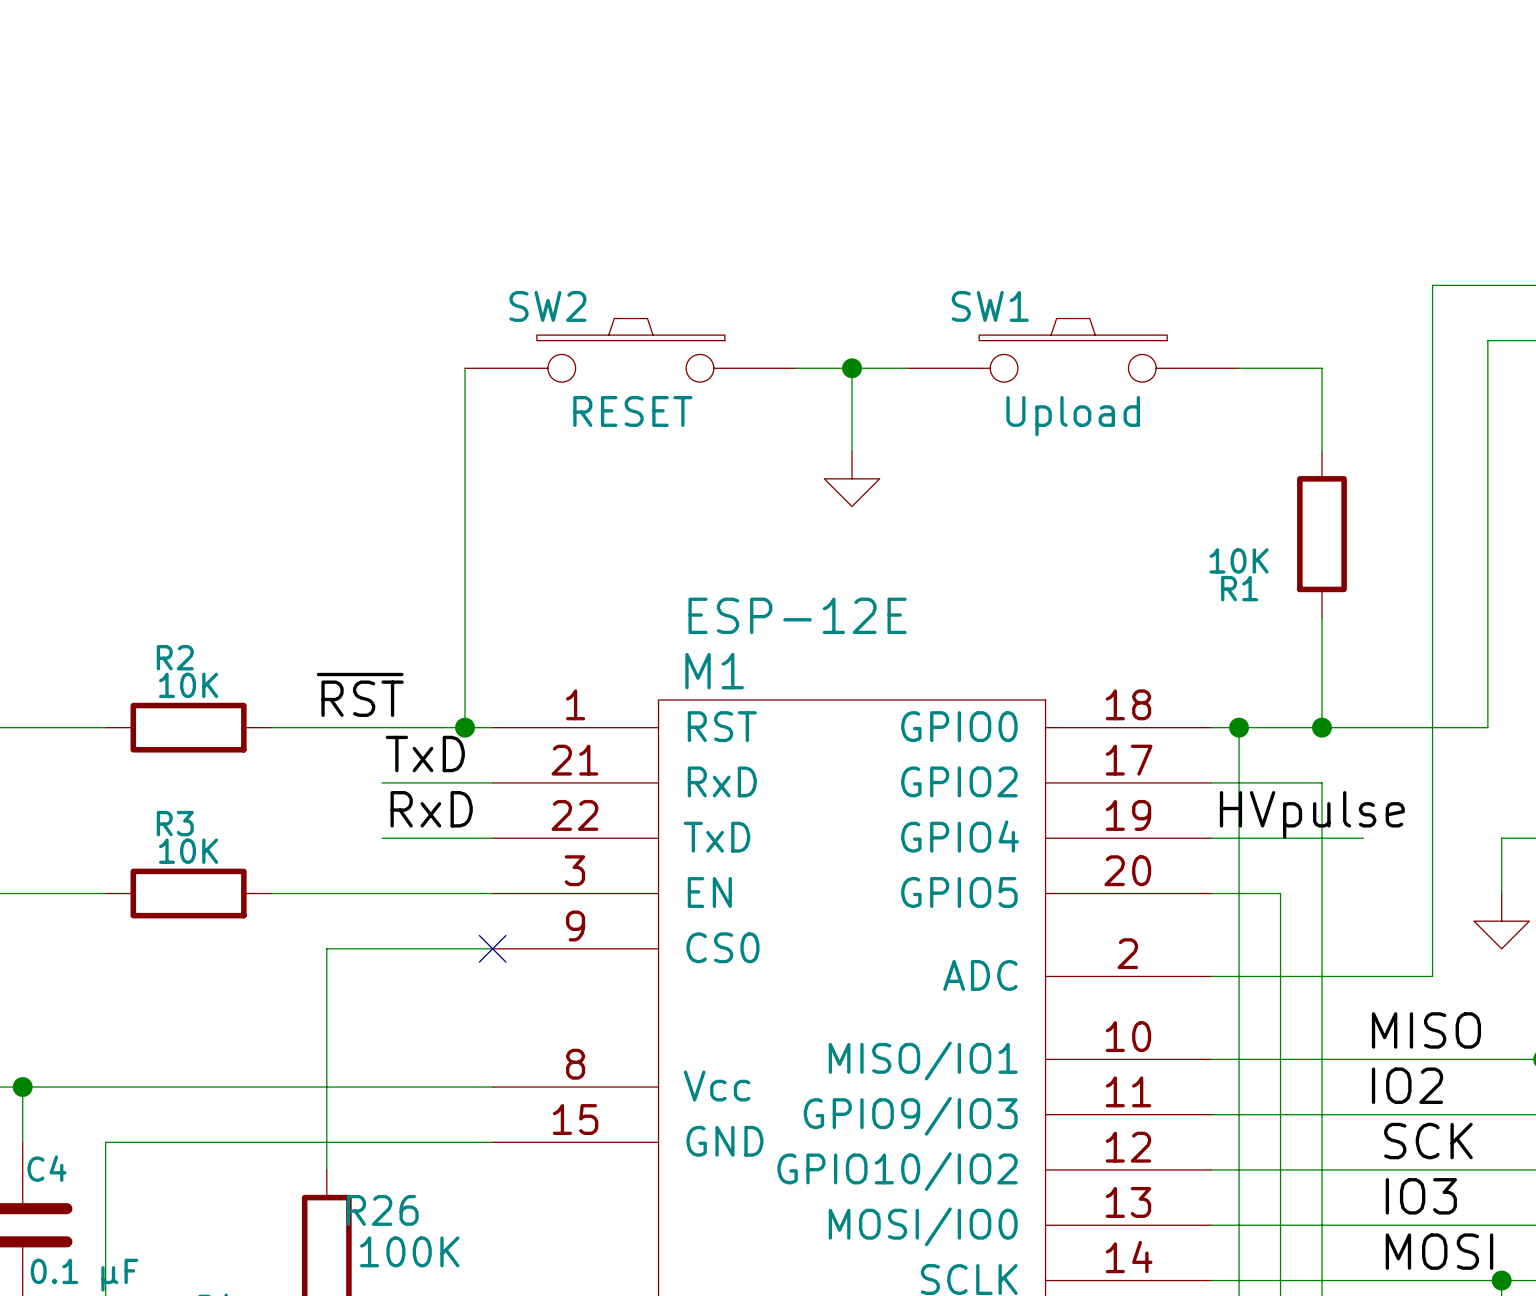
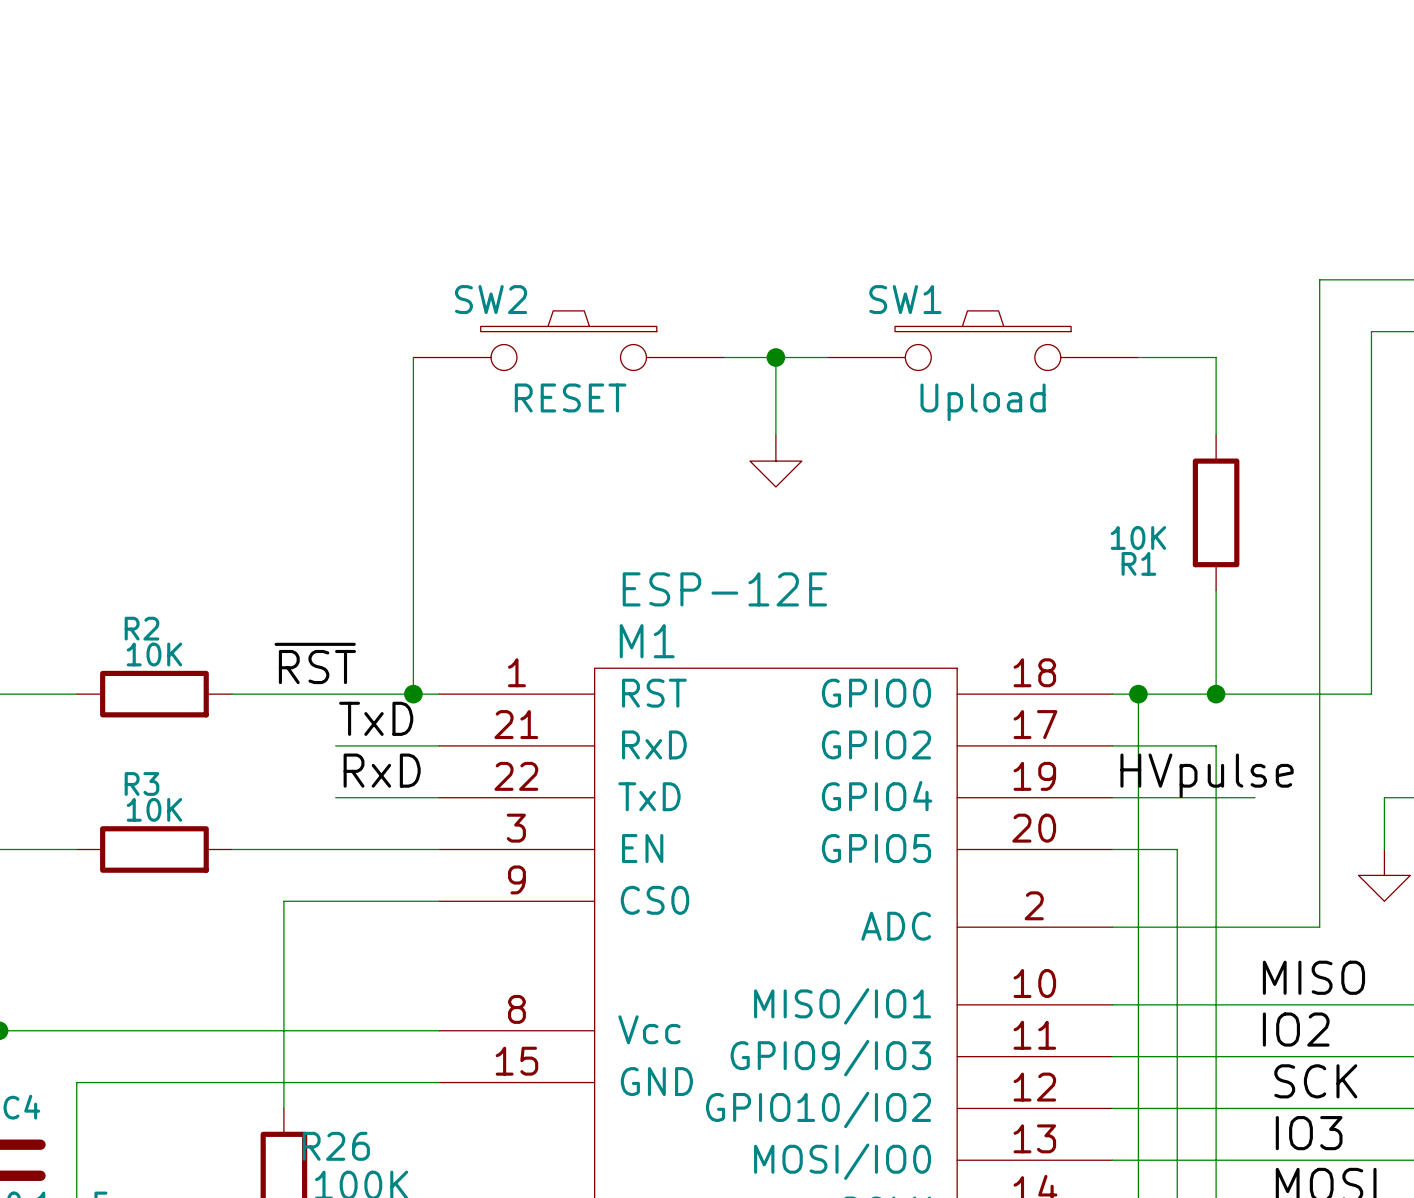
no-connect mark: (492, 948) -> none

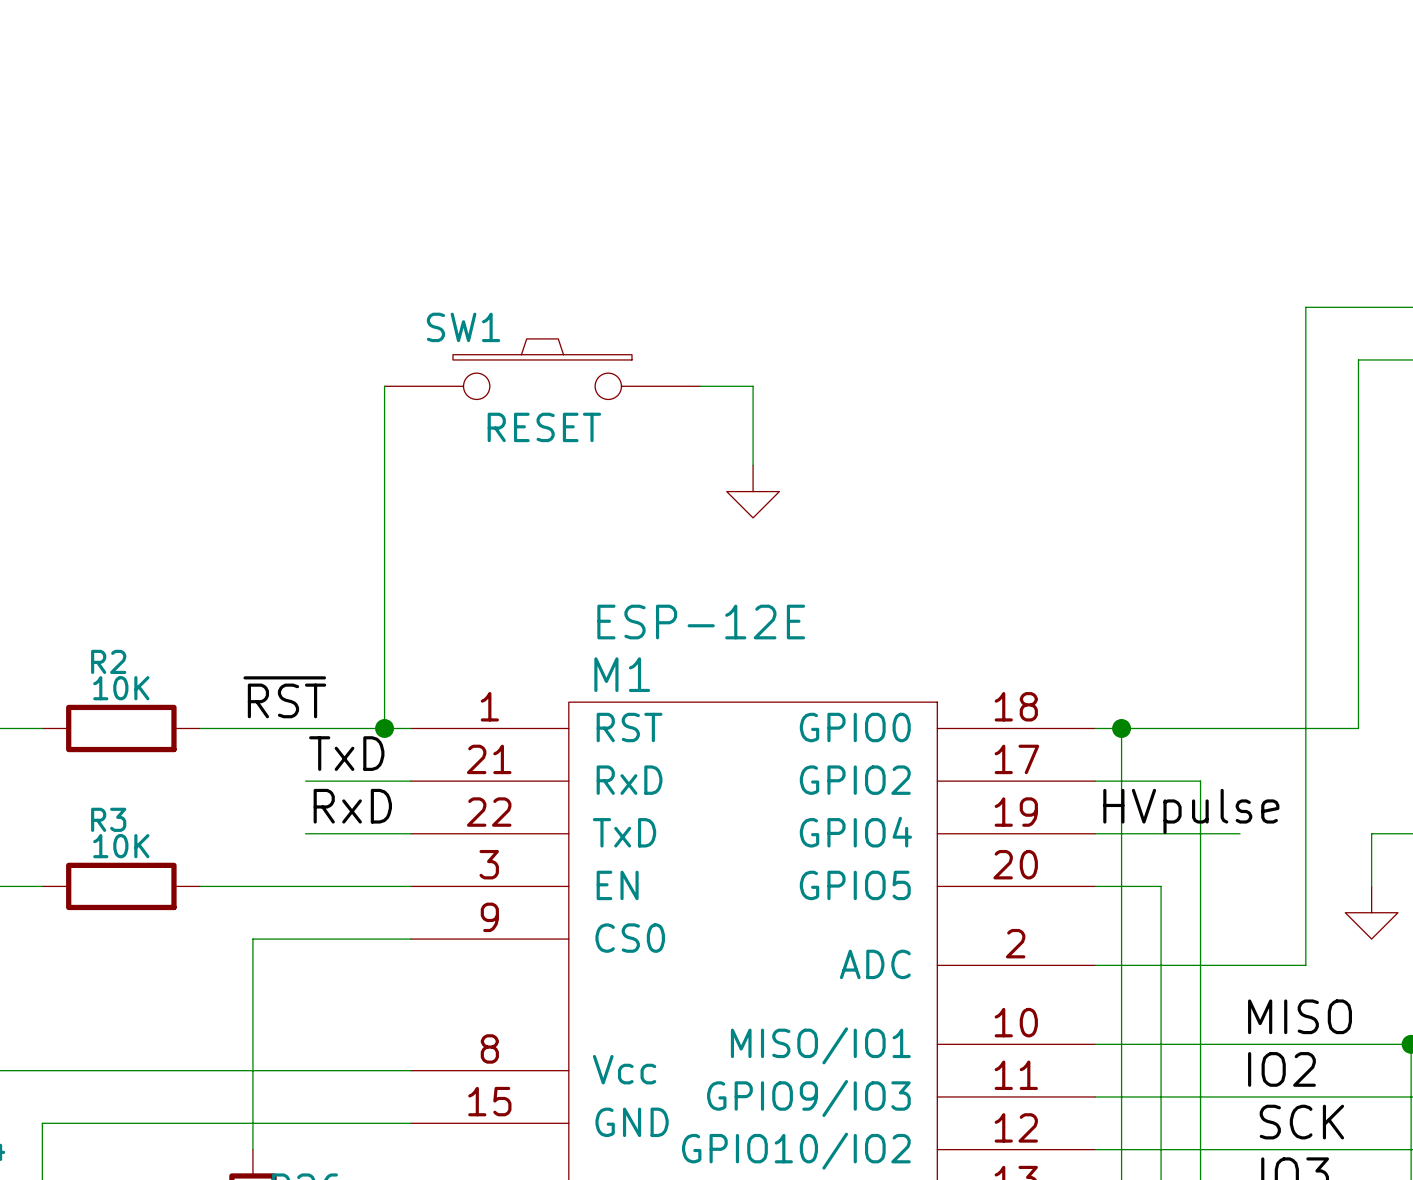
SW2 name: SW2 (491, 299) -> SW1 (463, 327)
SW1: Upload (983, 340) -> none
wire: (775, 357) (827, 357) -> none
junction: (775, 357) -> none
wire: (1138, 357) (1216, 357) (1216, 435) -> none
R1: 10K (1216, 512) -> none
wire: (1216, 590) (1216, 694) -> none
junction: (1216, 694) -> none

